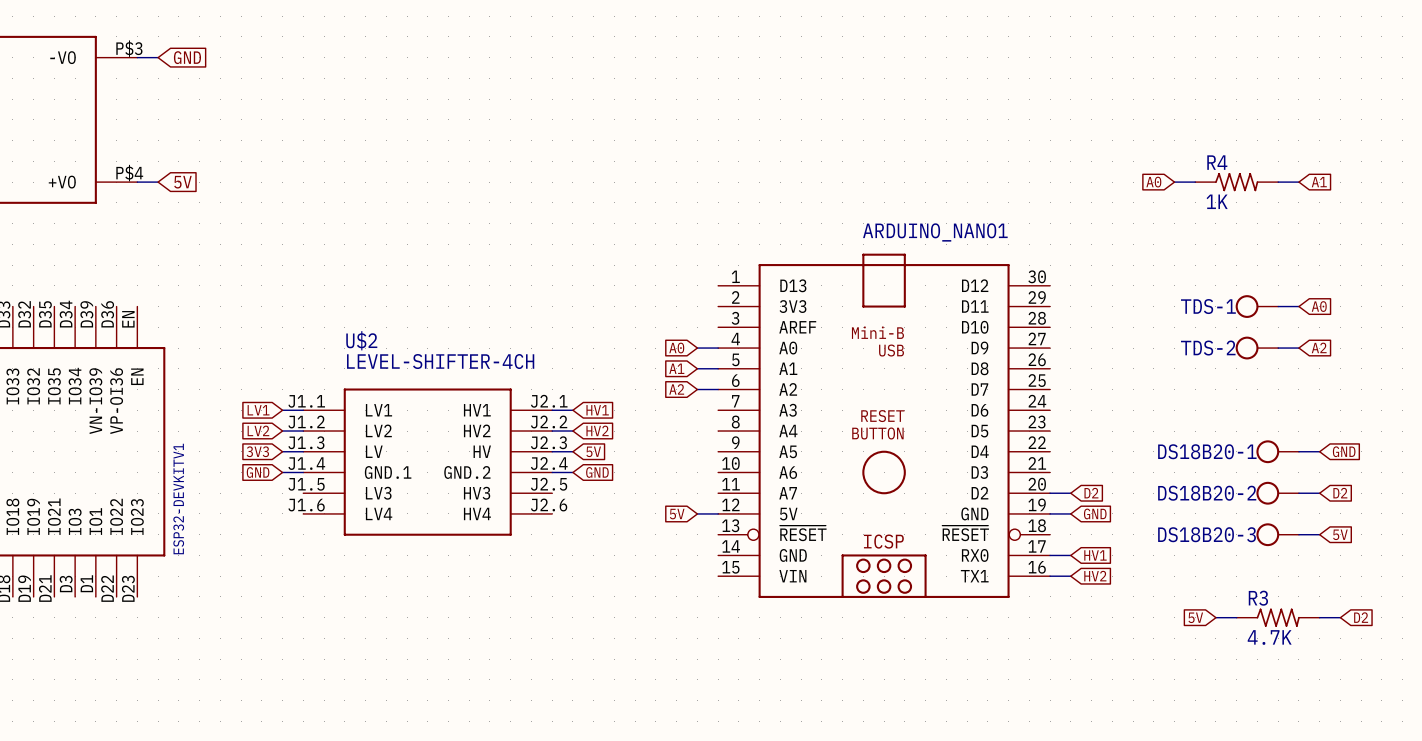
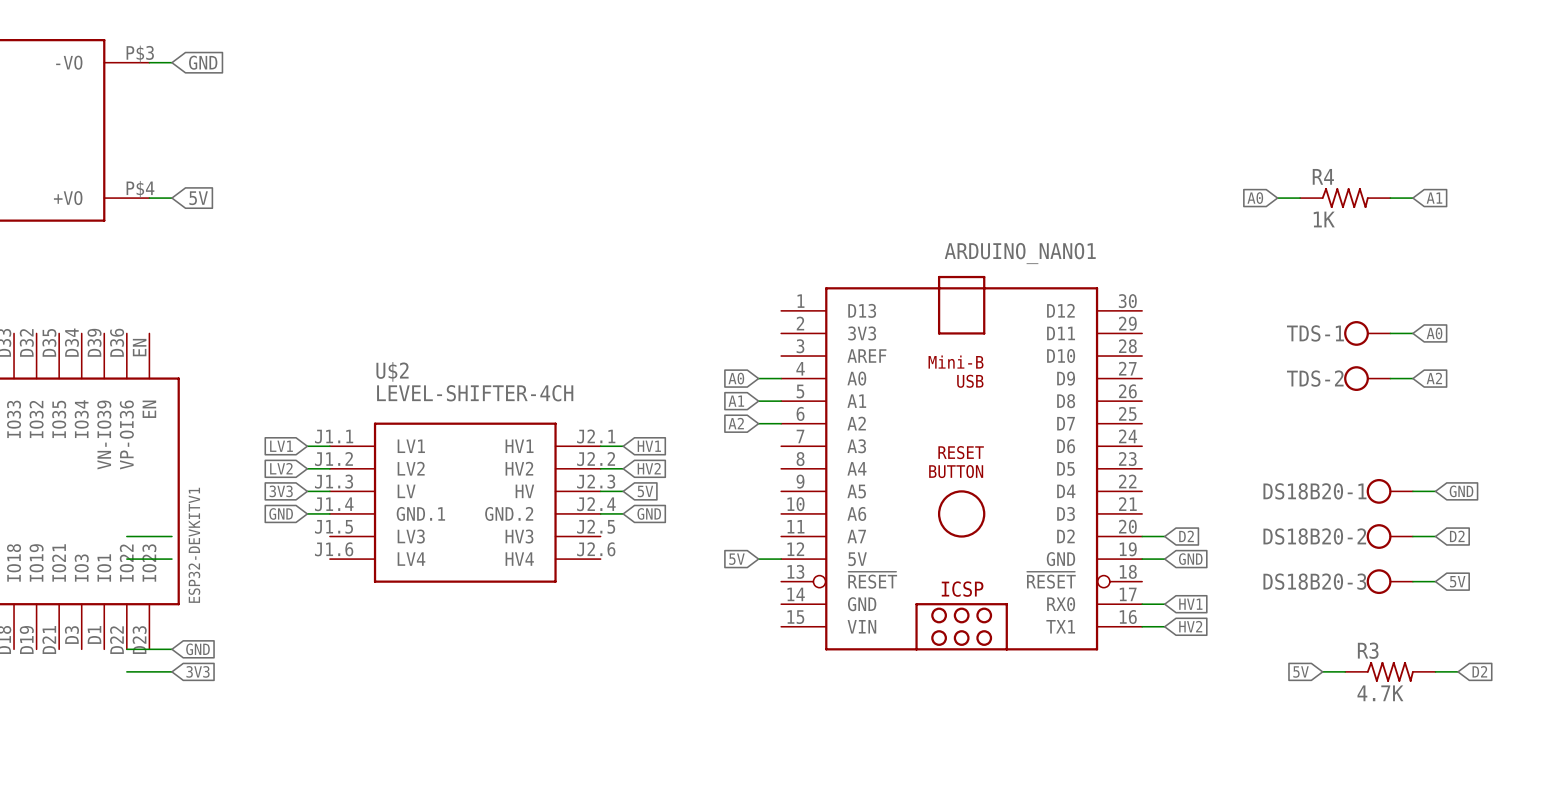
wire: none -> (126, 536) (171, 536)
wire: none -> (126, 559) (171, 559)
wire: none -> (126, 649) (171, 649)
global label: none -> GND (197, 649)
wire: none -> (126, 671) (171, 671)
global label: none -> 3V3 (198, 671)

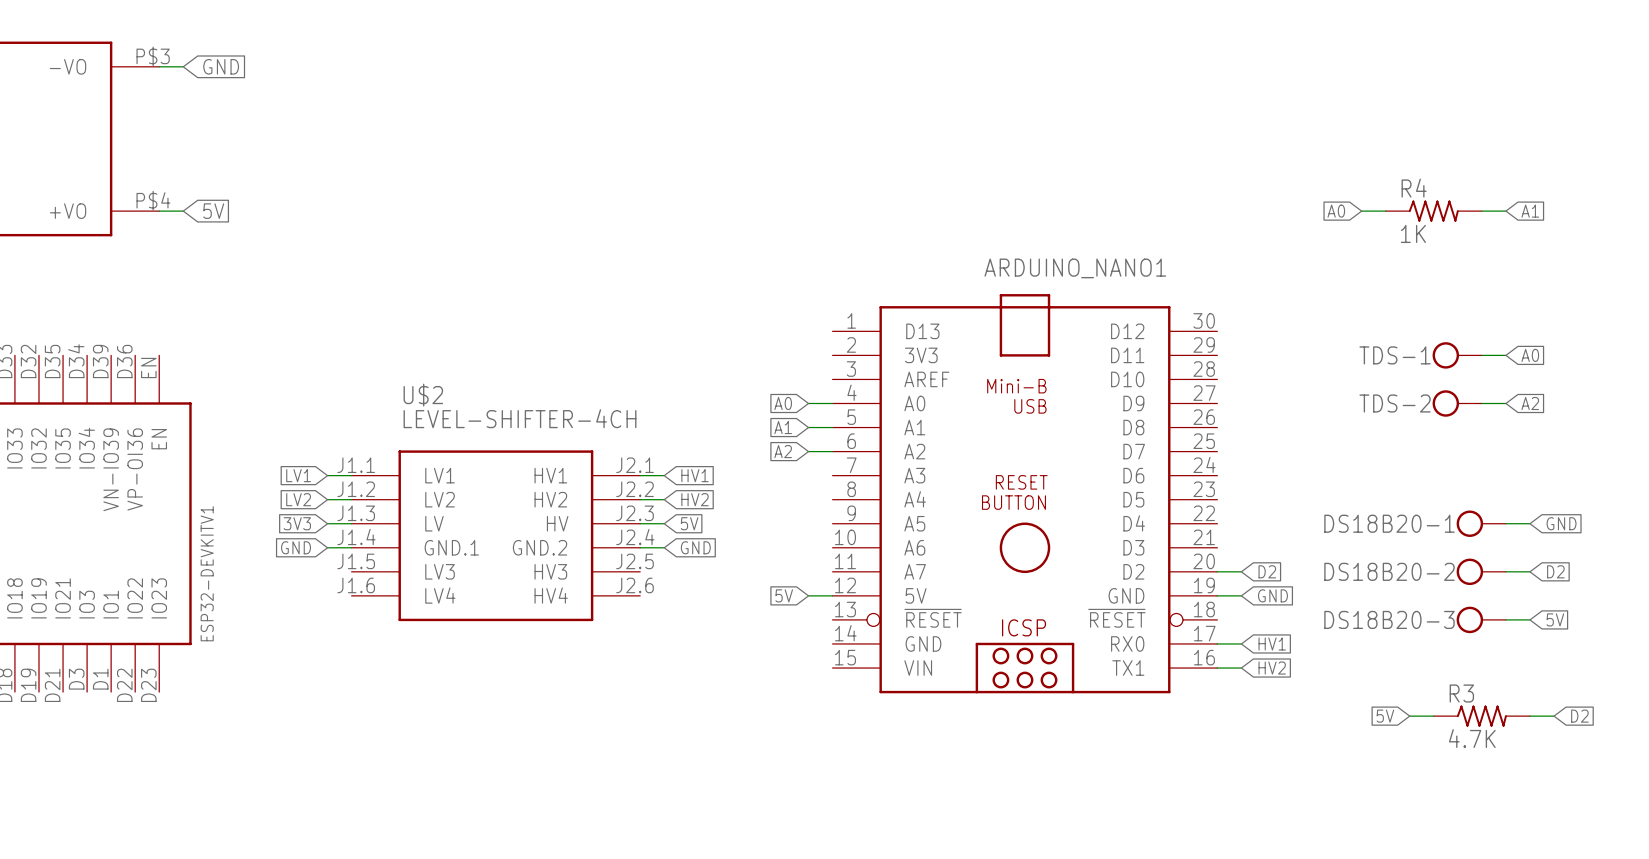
wire: (126, 536) (171, 536) -> none
wire: (126, 559) (171, 559) -> none
wire: (126, 649) (171, 649) -> none
global label: GND (197, 649) -> none
wire: (126, 671) (171, 671) -> none
global label: 3V3 (198, 671) -> none

